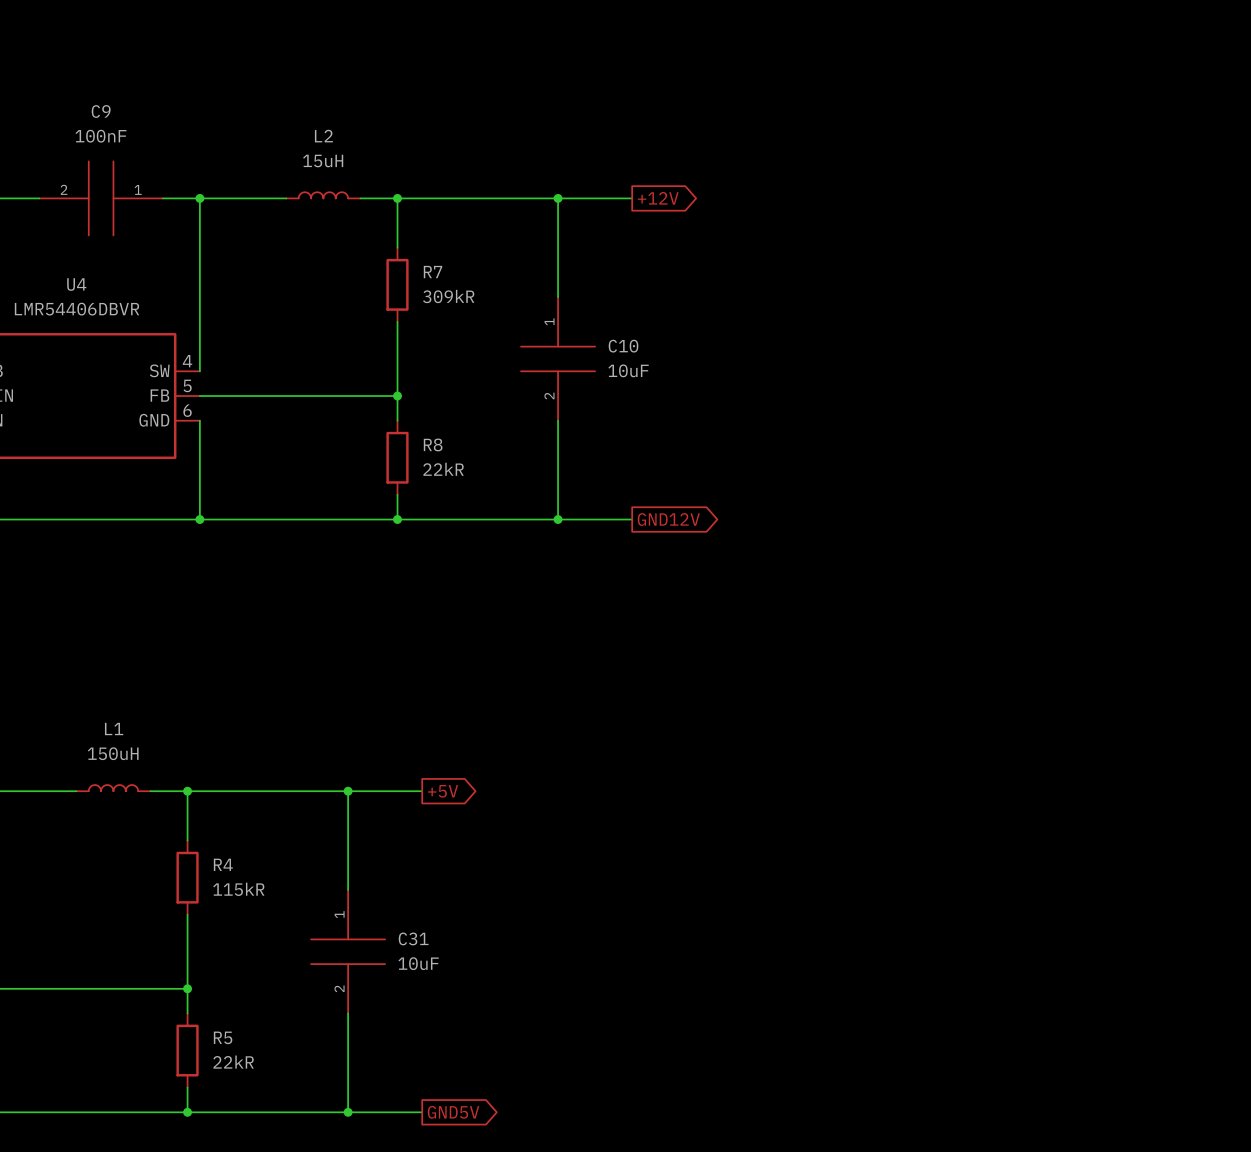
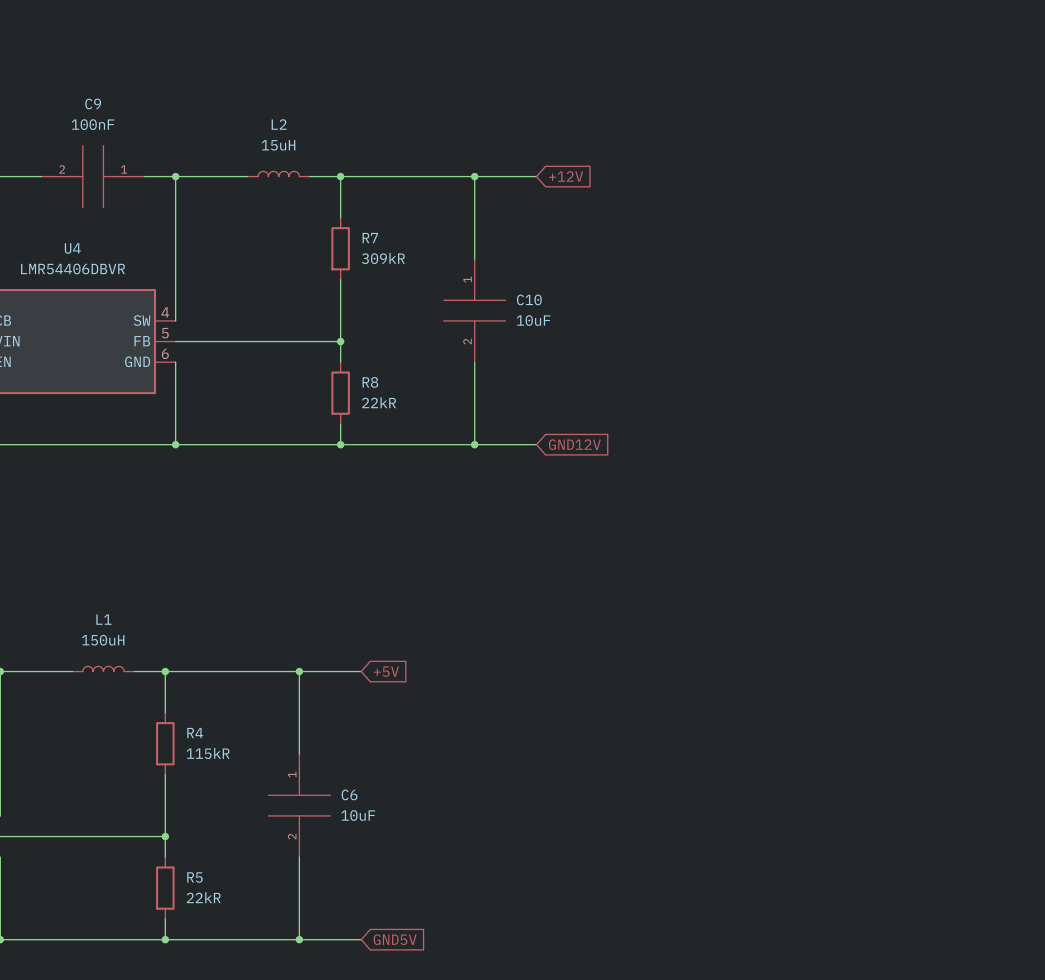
global label shape: output (658, 198) -> input (566, 176)
global label shape: output (668, 519) -> input (574, 444)
global label shape: output (442, 791) -> input (386, 671)
C31 name: C31 (413, 938) -> C6 (349, 794)
global label shape: output (453, 1112) -> input (395, 939)

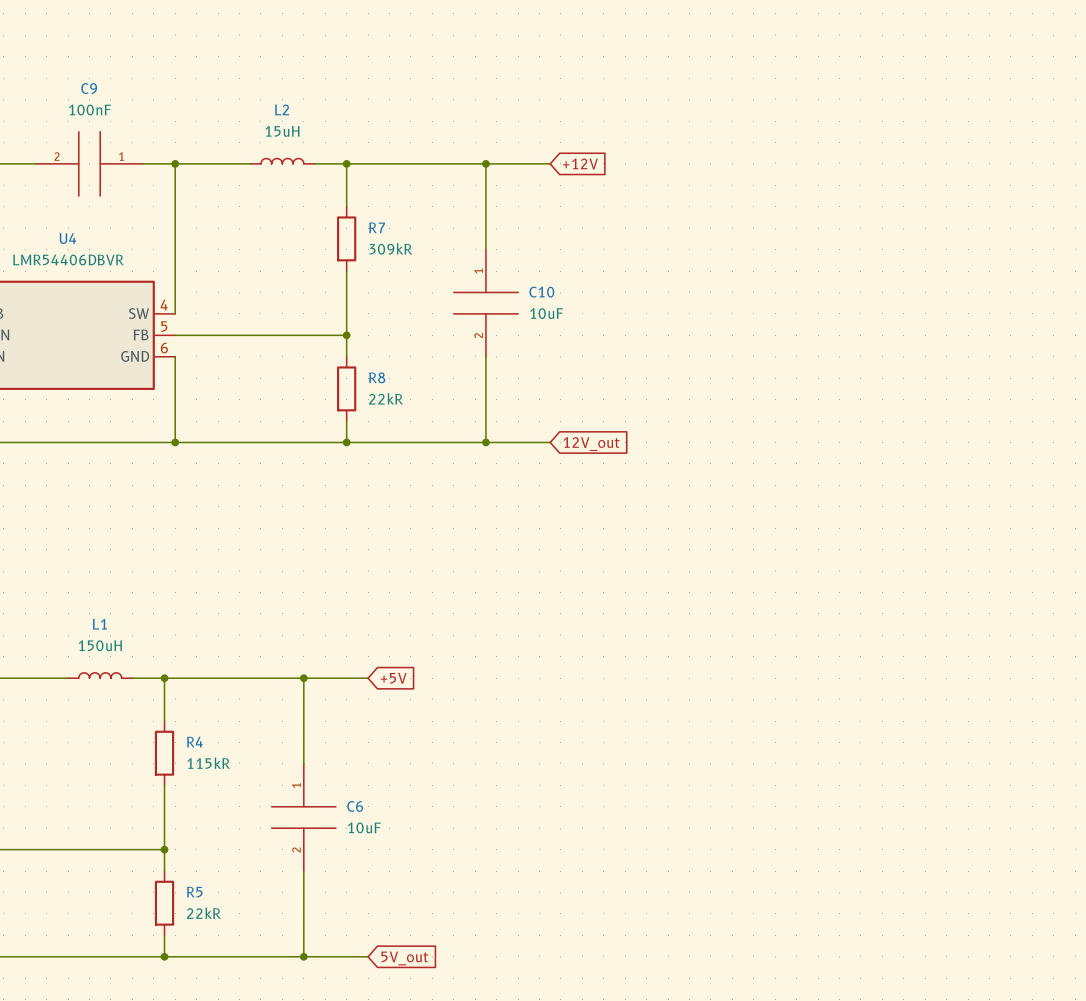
global label: GND12V (574, 444) -> 12V_out (591, 444)
global label: GND5V (395, 939) -> 5V_out (404, 958)

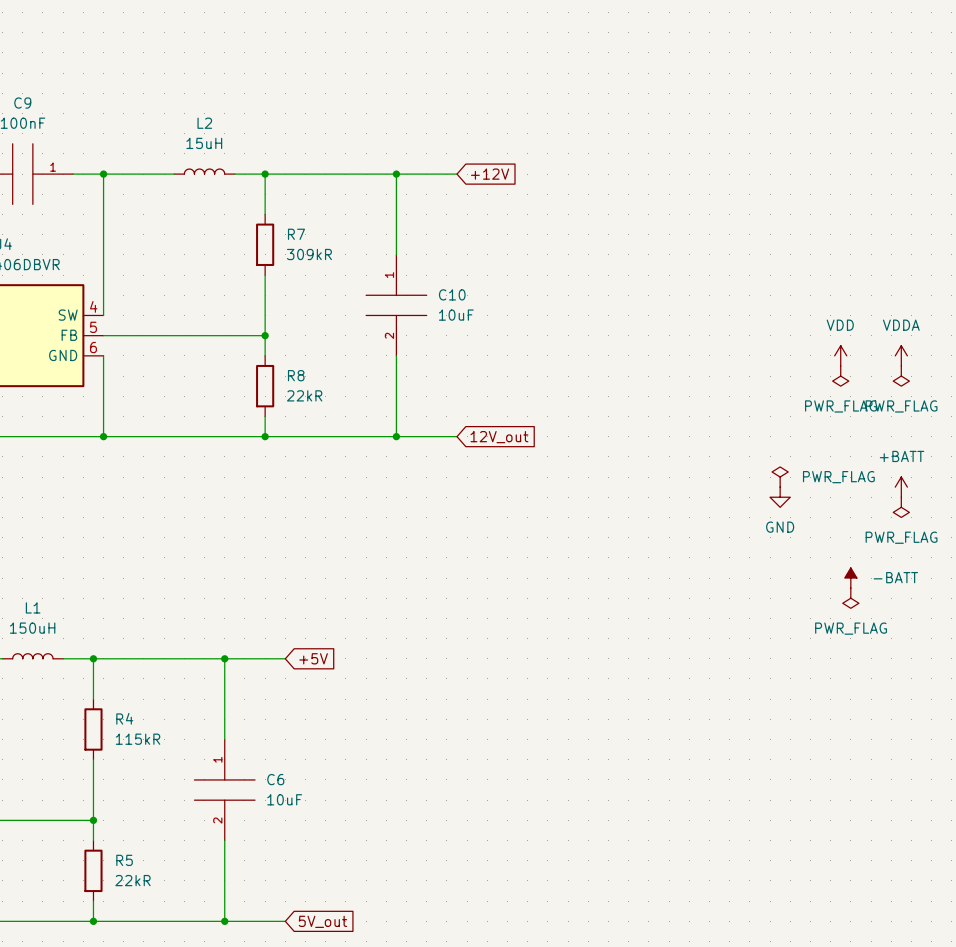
power symbol: none -> VDD (840, 355)
power symbol: none -> VDDA (901, 355)
power symbol: none -> PWR_FLAG (840, 376)
power symbol: none -> PWR_FLAG (901, 376)
power symbol: none -> PWR_FLAG (780, 477)
power symbol: none -> +BATT (901, 487)
power symbol: none -> GND (780, 497)
power symbol: none -> PWR_FLAG (901, 507)
power symbol: none -> -BATT (850, 578)
power symbol: none -> PWR_FLAG (850, 598)

